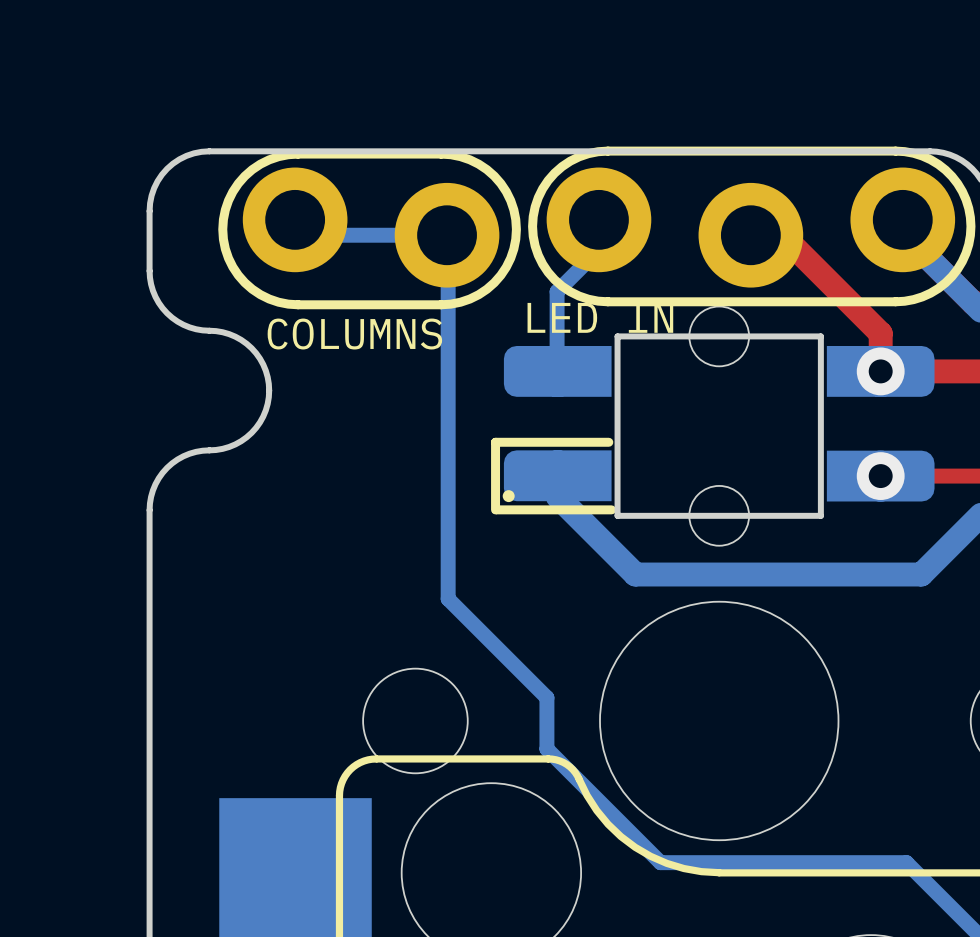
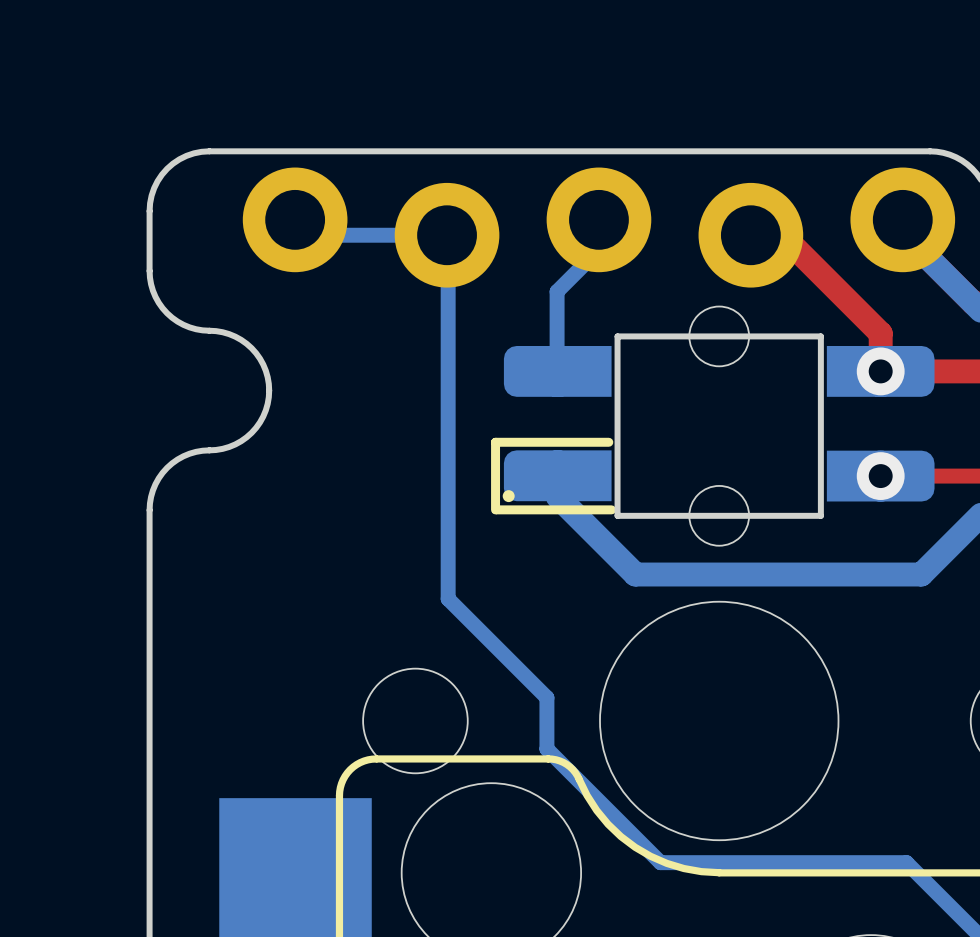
line: (895, 151) (607, 151) (588, 153) (562, 166) (542, 188) (533, 216) (535, 245) (542, 264) (562, 286) (579, 296) (598, 301) (895, 301) (913, 299) (938, 288) (957, 269) (968, 244) (970, 217) (962, 191) (945, 170) (922, 155) (895, 151) -> none
line: (441, 154) (298, 154) (278, 156) (260, 164) (238, 183) (225, 209) (223, 239) (232, 267) (244, 282) (260, 294) (288, 304) (441, 304) (460, 302) (478, 294) (494, 282) (510, 258) (515, 239) (513, 209) (506, 191) (486, 169) (460, 156) (441, 154) -> none
text: LED IN (600, 317) -> none
text: COLUMNS (354, 334) -> none

